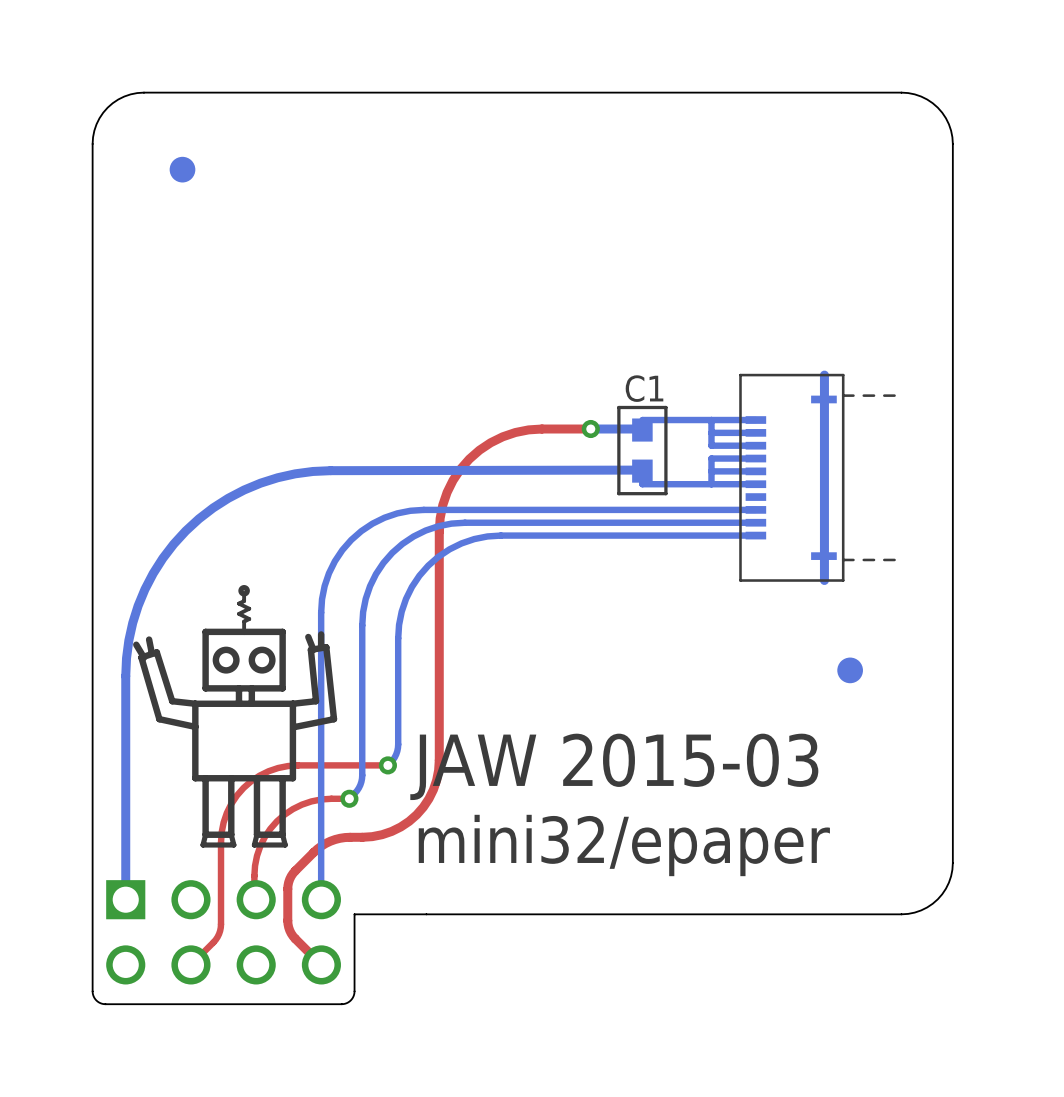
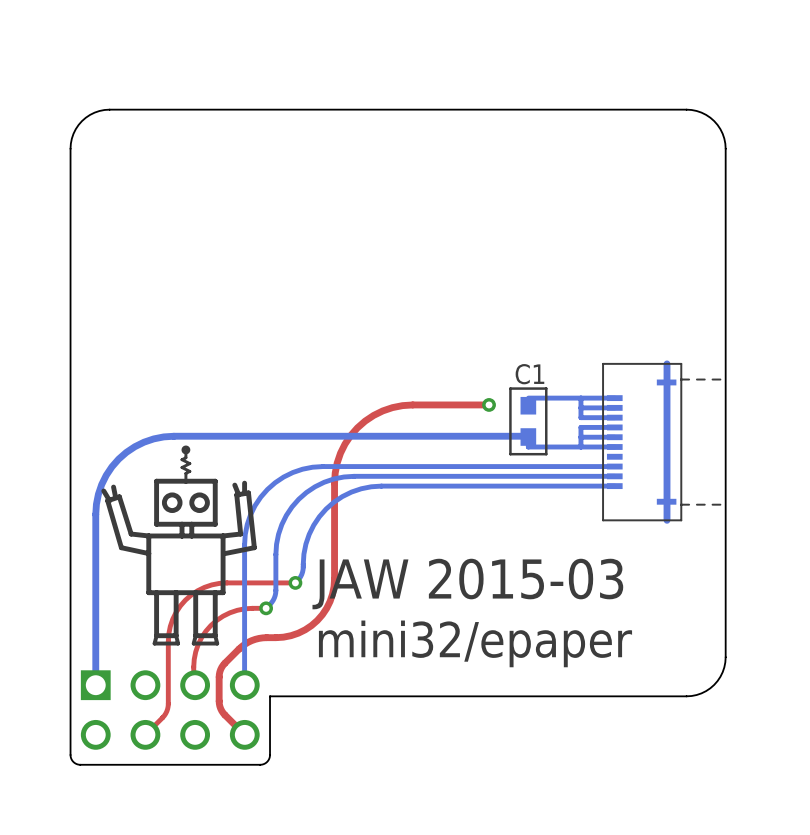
part: (182, 169) -> none
board edge: (952, 195) (952, 137) (945, 118) (937, 107) (927, 99) (914, 94) (901, 92) (137, 93) (124, 96) (112, 103) (103, 112) (96, 124) (92, 143) (92, 195) -> (725, 148) (722, 133) (714, 121) (701, 112) (686, 109) (109, 109) (94, 112) (81, 121) (73, 133) (70, 148)
bottom track: (824, 375) (824, 580) -> (667, 363) (667, 520)
bottom track: (711, 420) (711, 445) (755, 445) -> (580, 398) (580, 417) (614, 417)
bottom track: (755, 420) (642, 420) (642, 430) (590, 429) -> none
top track: (590, 429) (541, 429) (515, 432) (502, 436) (479, 450) (460, 469) (447, 492) (440, 518) (439, 634) -> (489, 404) (402, 405) (373, 415) (357, 427) (345, 444) (337, 462) (334, 483)
via position: (590, 429) -> (489, 404)
bottom track: (755, 432) (711, 432) -> (614, 407) (580, 407)
C1 position: (642, 450) -> (528, 421)
bottom track: (755, 458) (711, 458) (711, 484) -> (614, 427) (580, 427) (580, 446)
bottom track: (755, 471) (711, 471) -> (614, 437) (580, 437)
part position: (817, 477) -> (661, 442)
bottom track: (755, 484) (642, 484) (641, 470) (330, 470) (295, 473) (277, 477) (260, 483) (228, 498) (198, 518) (173, 544) (153, 573) (138, 605) (128, 640) (125, 676) -> (614, 446) (528, 446) (527, 436) (163, 436) (134, 446) (111, 466) (98, 494) (95, 514)
bottom track: (755, 509) (423, 509) (397, 513) (384, 517) (361, 531) (351, 539) (334, 561) (324, 586) (321, 612) (321, 715) -> (614, 466) (322, 466) (302, 469) (275, 482) (260, 497) (247, 524) (244, 544)
bottom track: (694, 522) (464, 522) (438, 526) (413, 536) (392, 552) (383, 562) (376, 574) (365, 598) (362, 625) (362, 728) -> (614, 476) (354, 476) (333, 478) (306, 492) (292, 506) (278, 534) (275, 554)
bottom track: none -> (614, 398) (575, 398)
bottom track: (755, 535) (500, 535) (474, 539) (449, 549) (428, 565) (419, 575) (411, 586) (401, 611) (398, 638) (398, 741) -> (614, 486) (381, 486) (361, 488) (333, 502) (319, 516) (305, 544) (303, 564)
part: (850, 670) -> none

